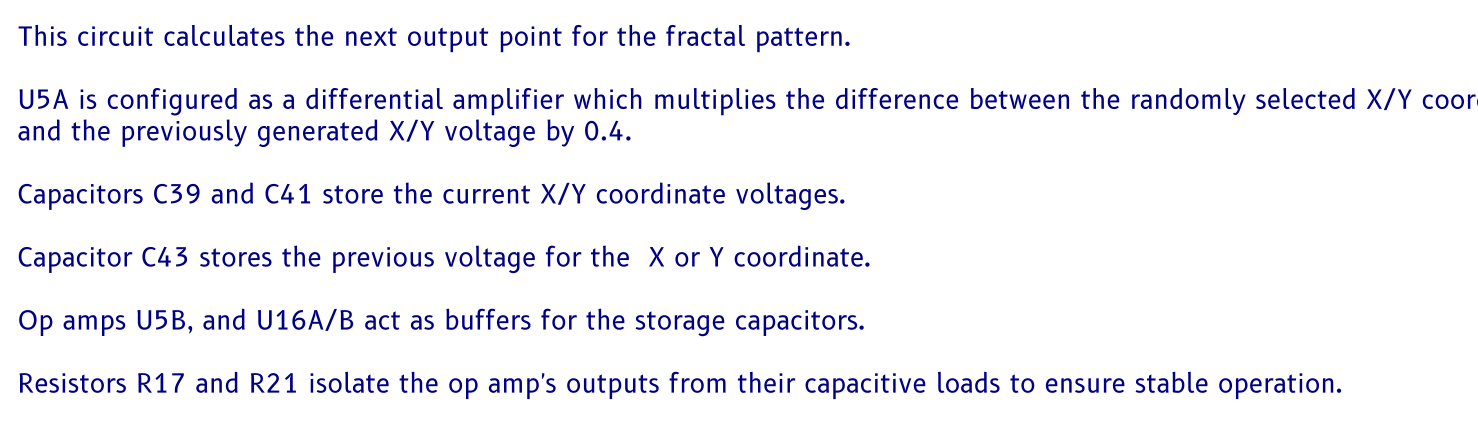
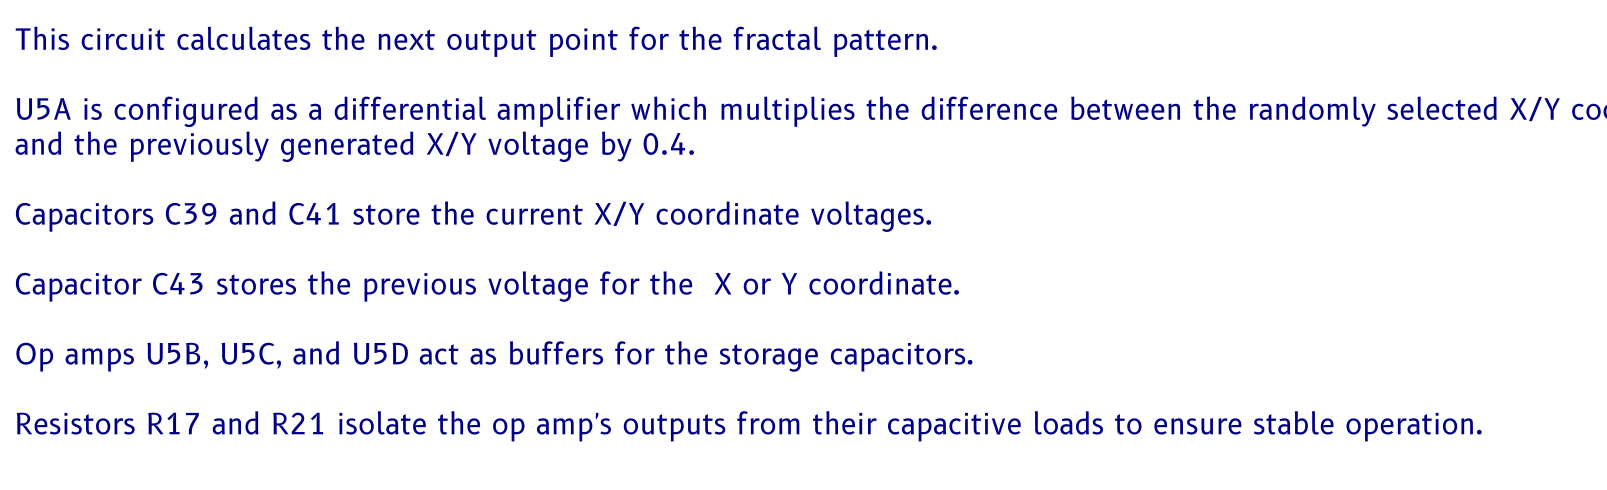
text: Op amps U5B, and U16A/B act as buffers for the storage capacitors. (441, 322) -> Op amps U5B, U5C, and U5D act as buffers for the storage capacitors. (494, 356)

